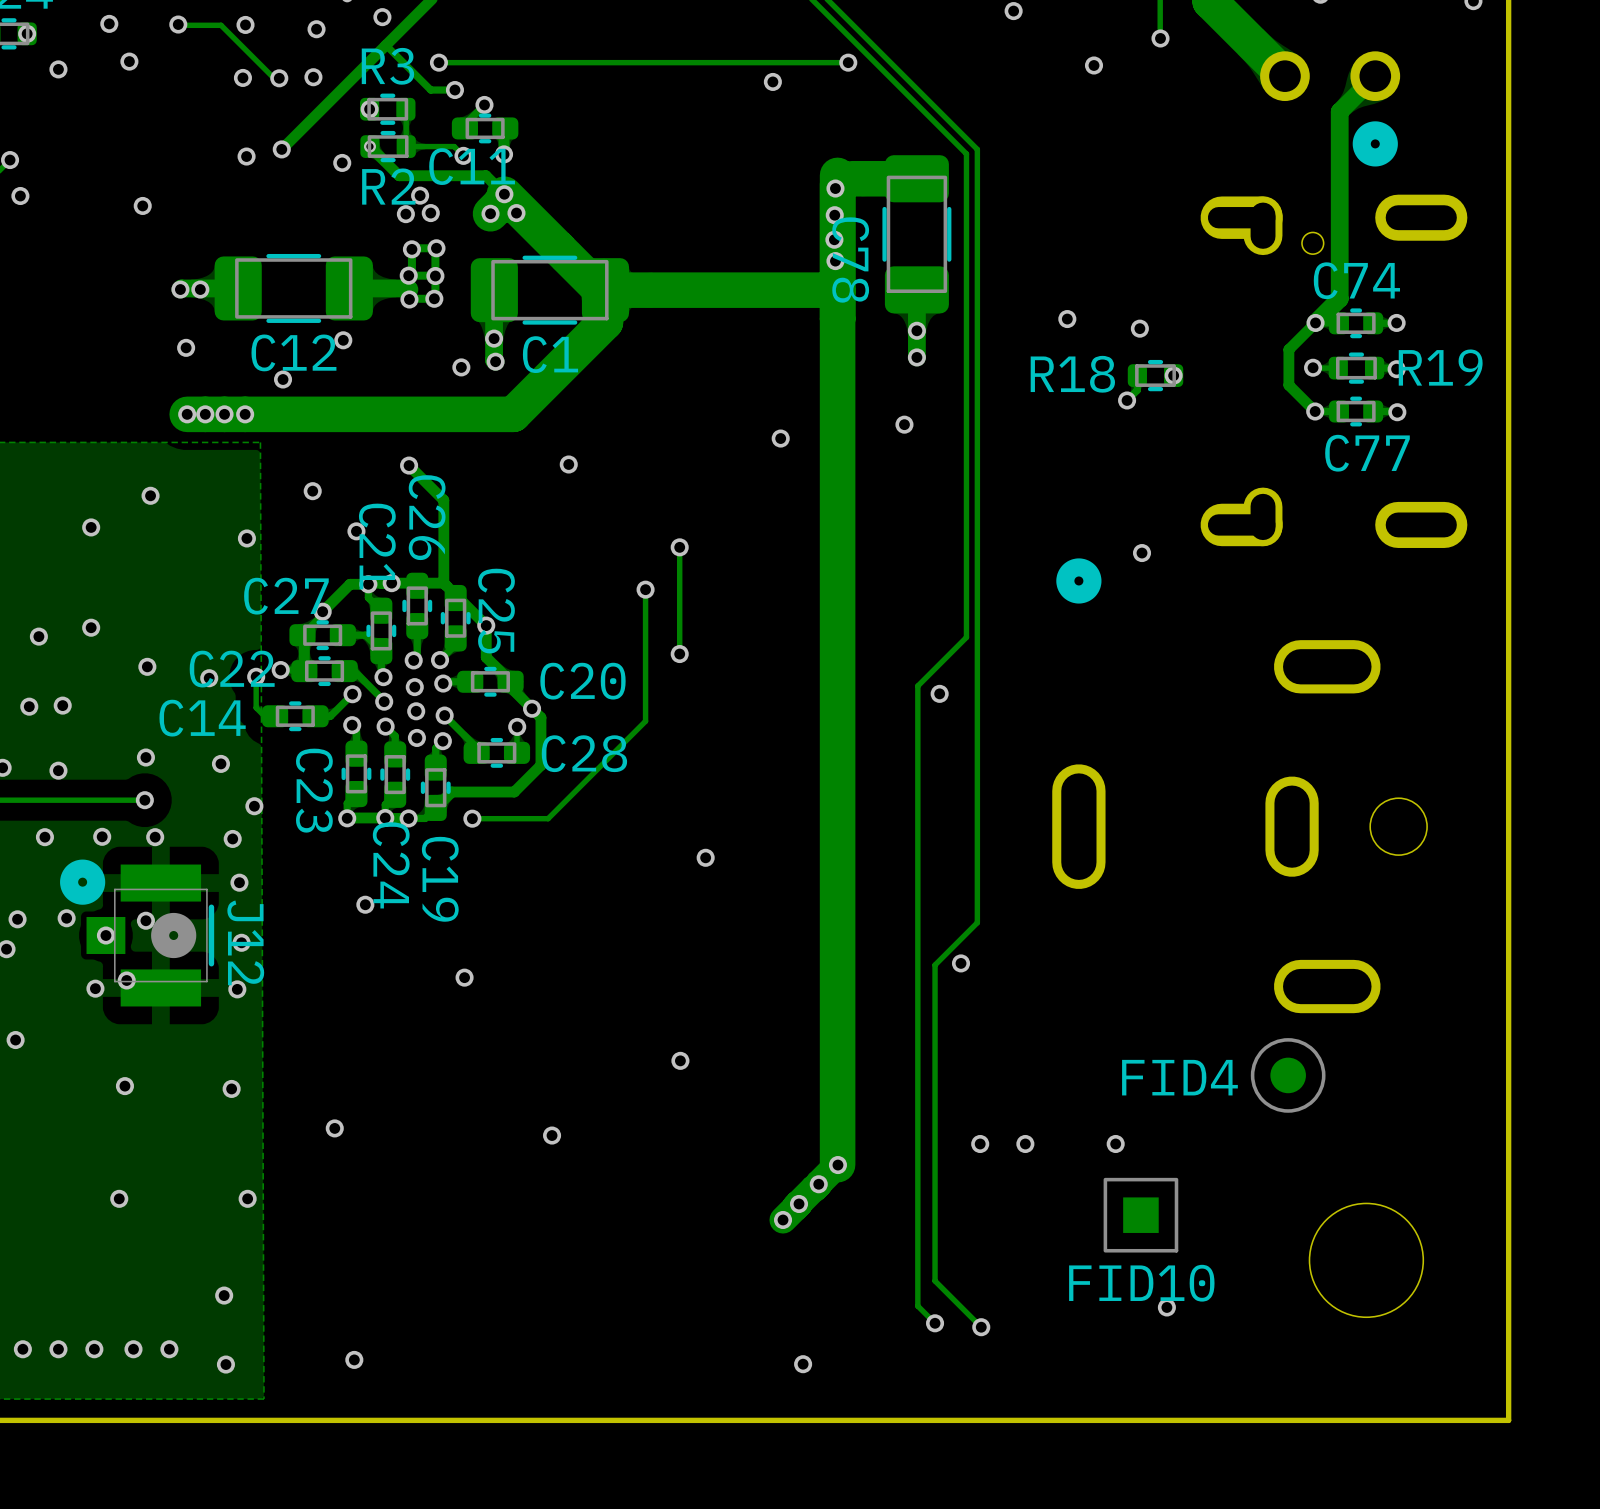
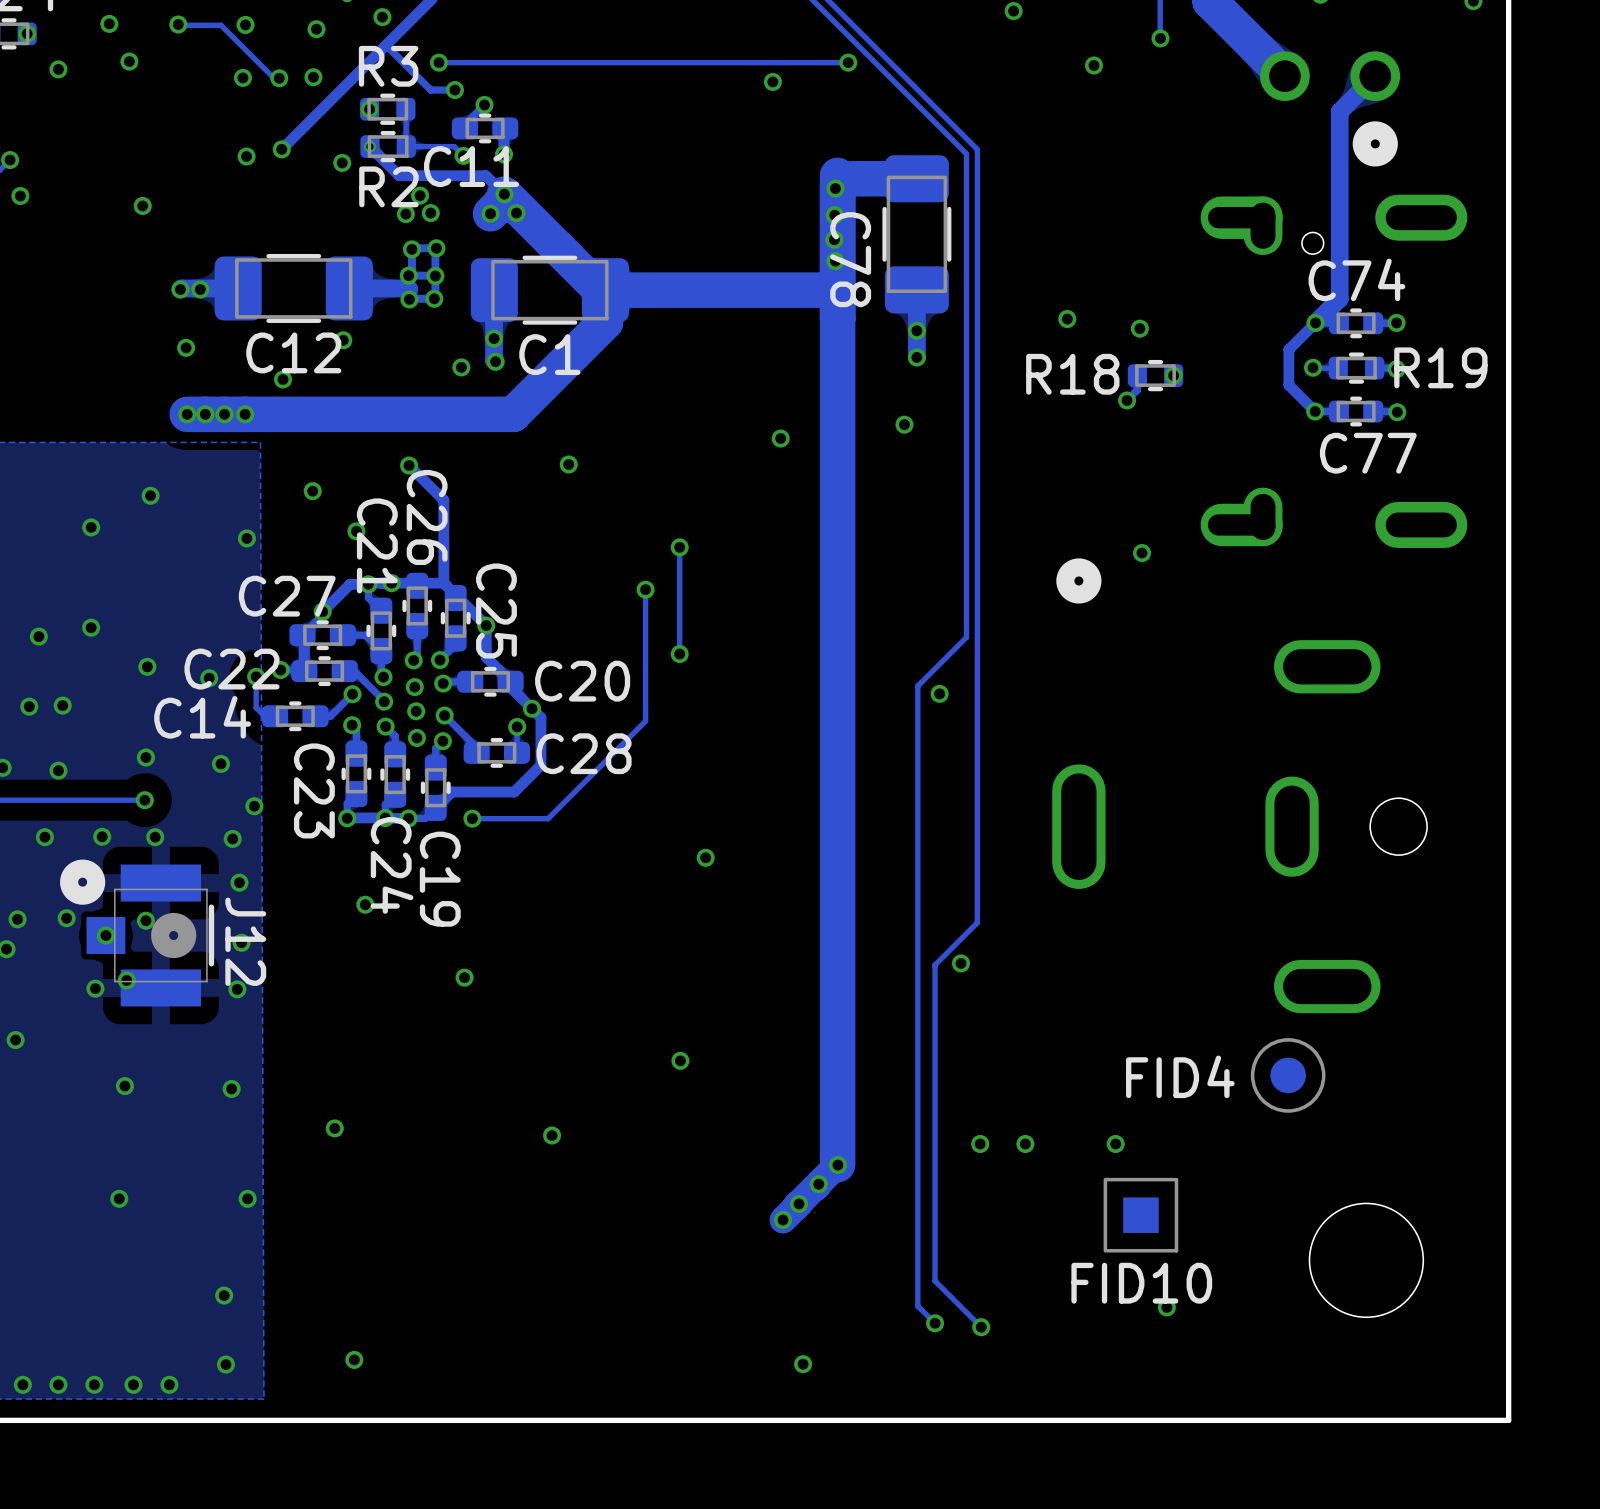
via: (22, 1349) -> none
via: (58, 1349) -> none
via: (94, 1349) -> none
via: (133, 1349) -> none
via: (169, 1349) -> none
via: none -> (22, 1384)
via: none -> (58, 1384)
via: none -> (94, 1384)
via: none -> (133, 1384)
via: none -> (169, 1384)

